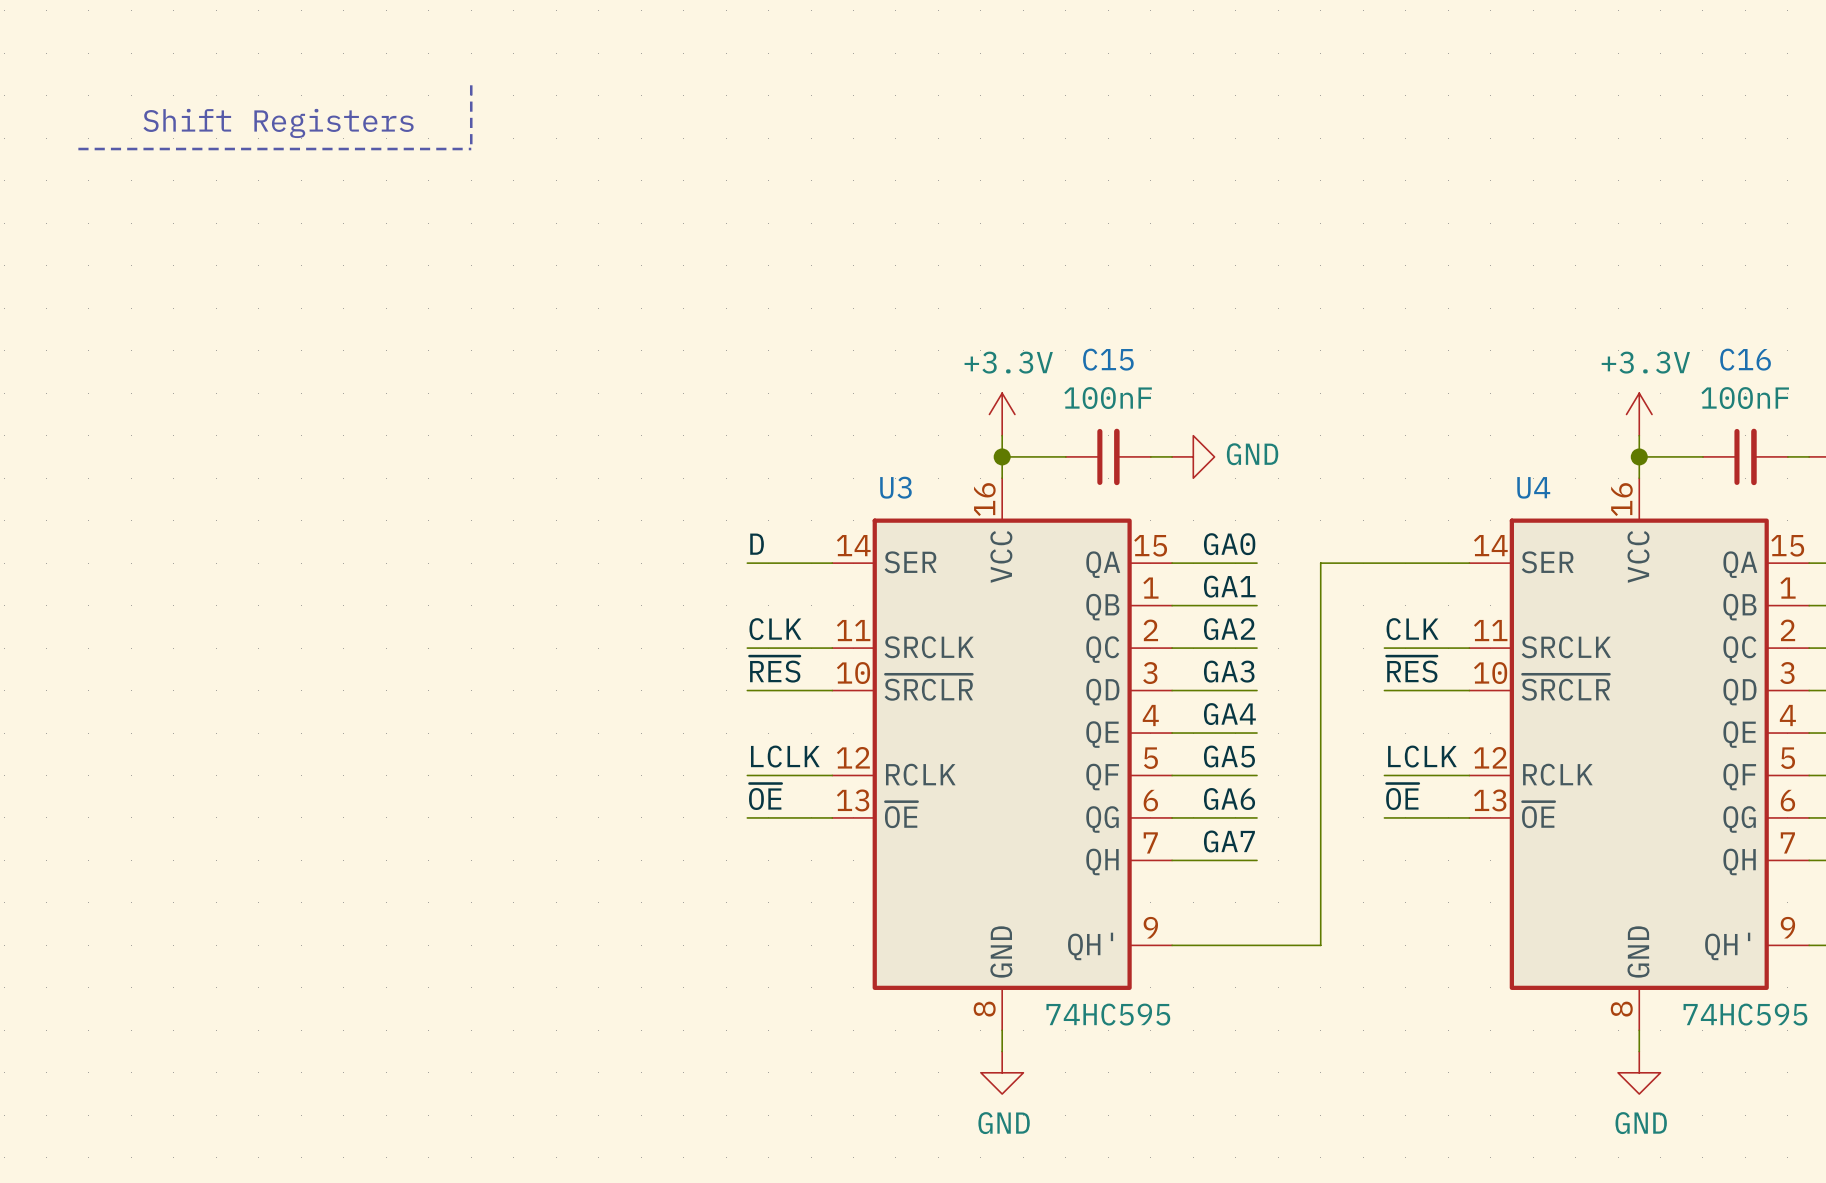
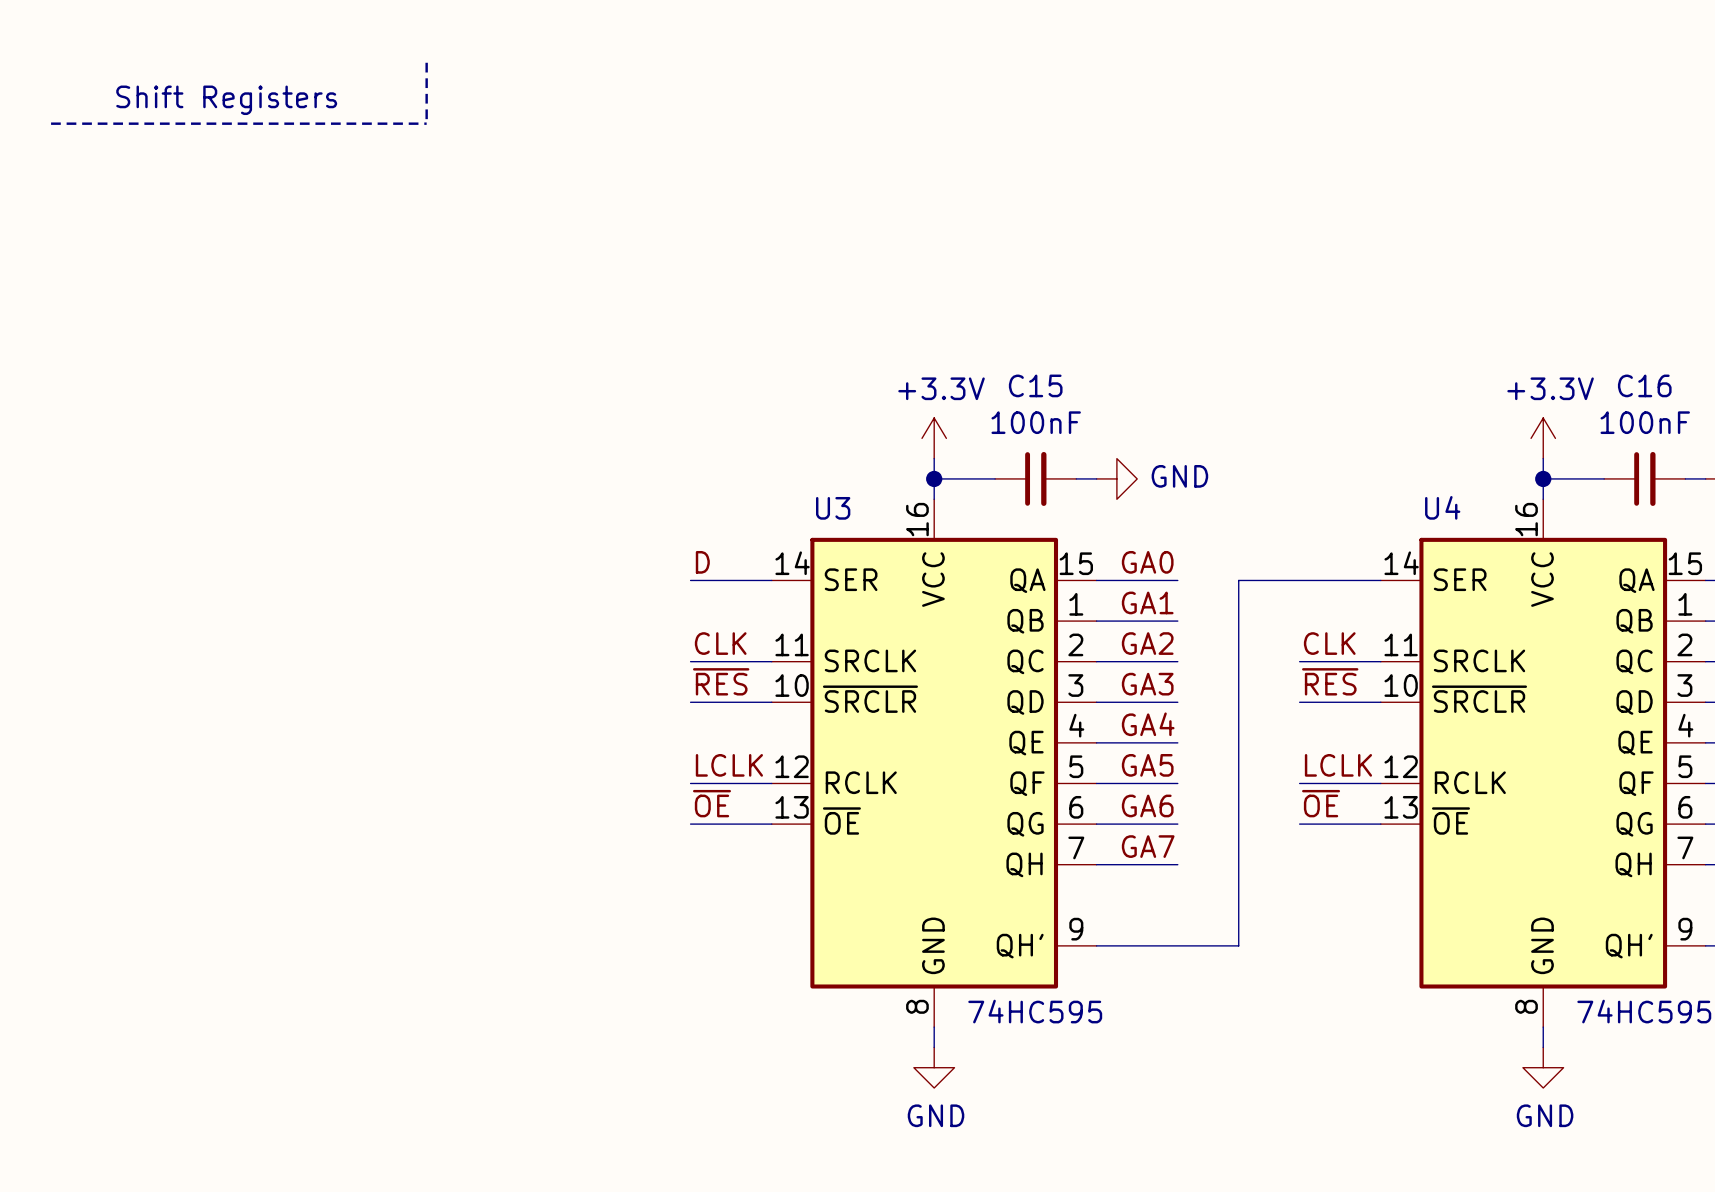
line: (471, 85) (471, 149) (78, 149) -> (426, 62) (426, 123) (51, 123)
text position: Shift Registers (278, 123) -> Shift Registers (226, 100)

